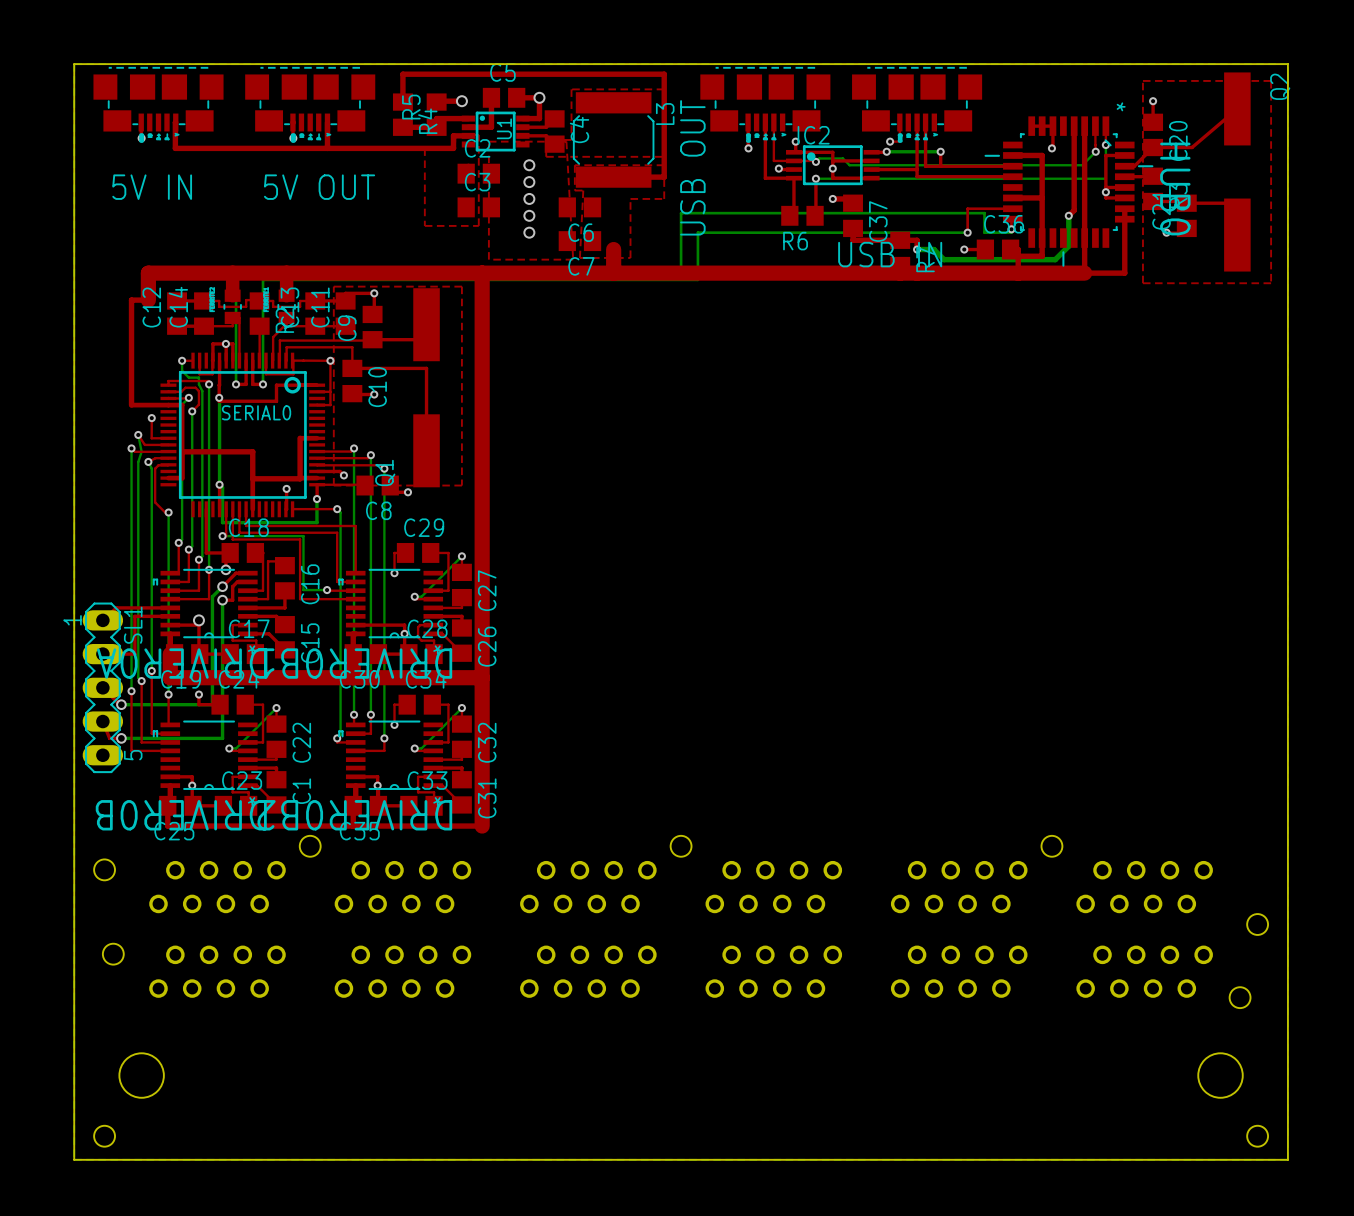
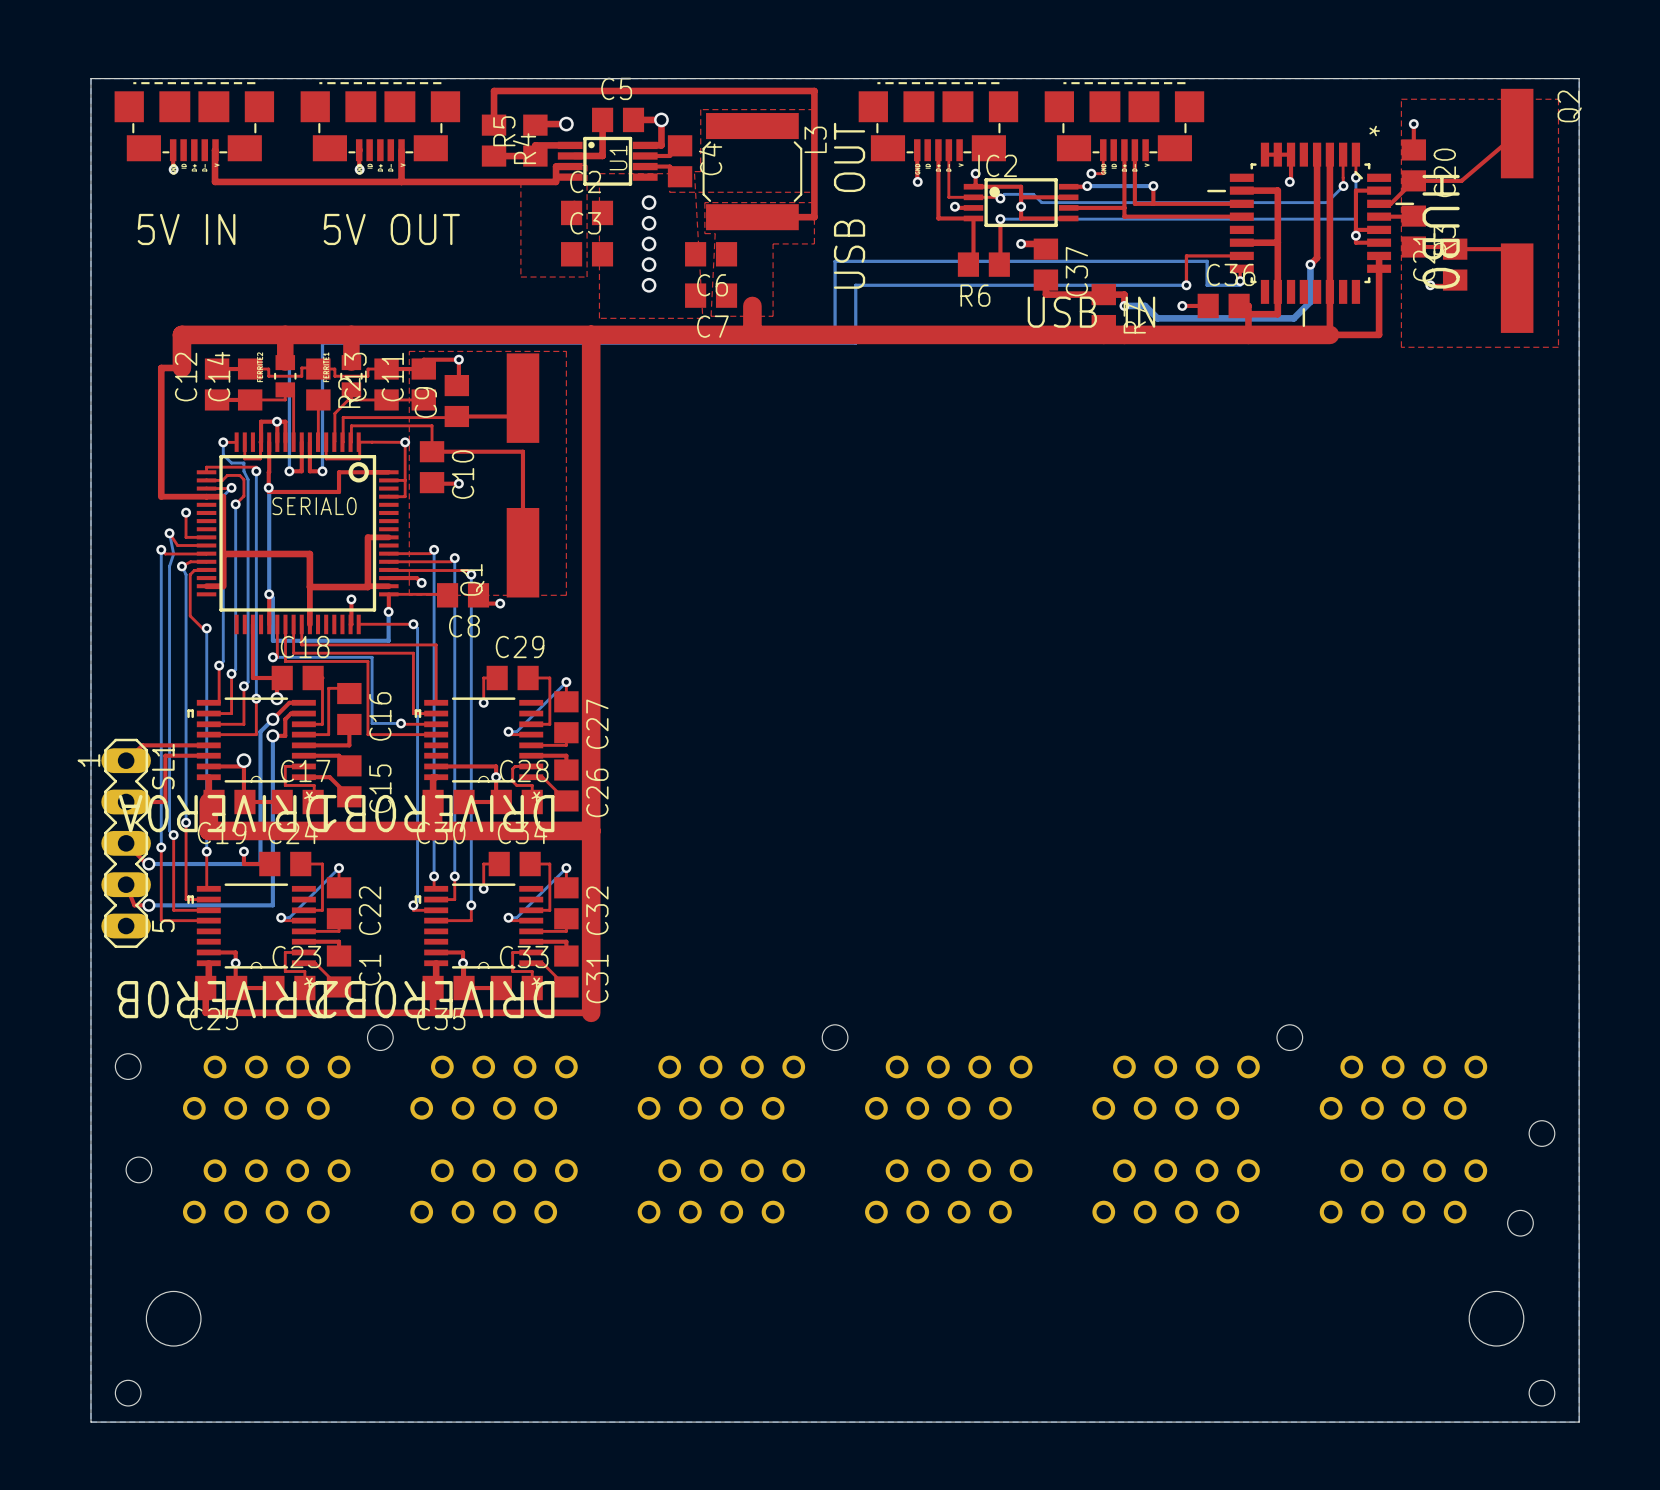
U1 footprint: [461, 111, 530, 152] -> [557, 136, 658, 186]

